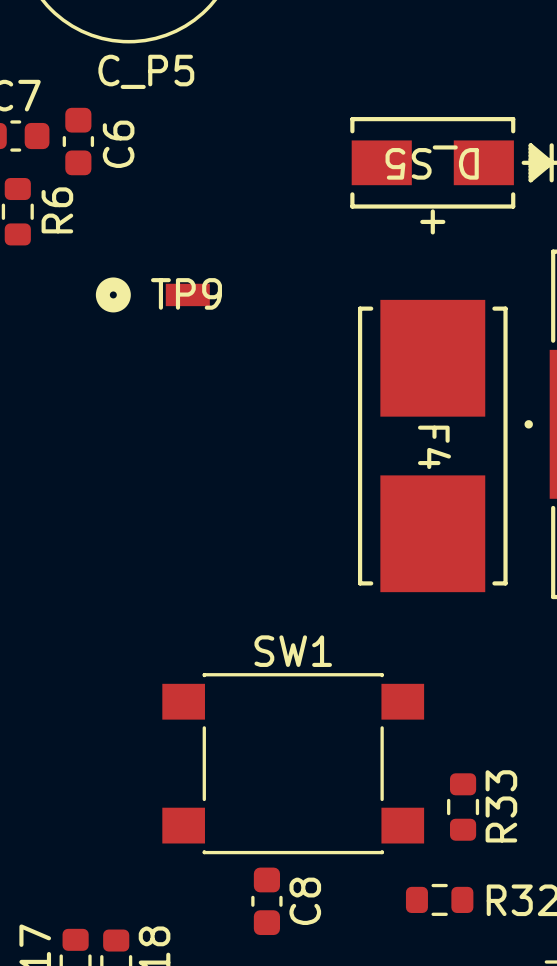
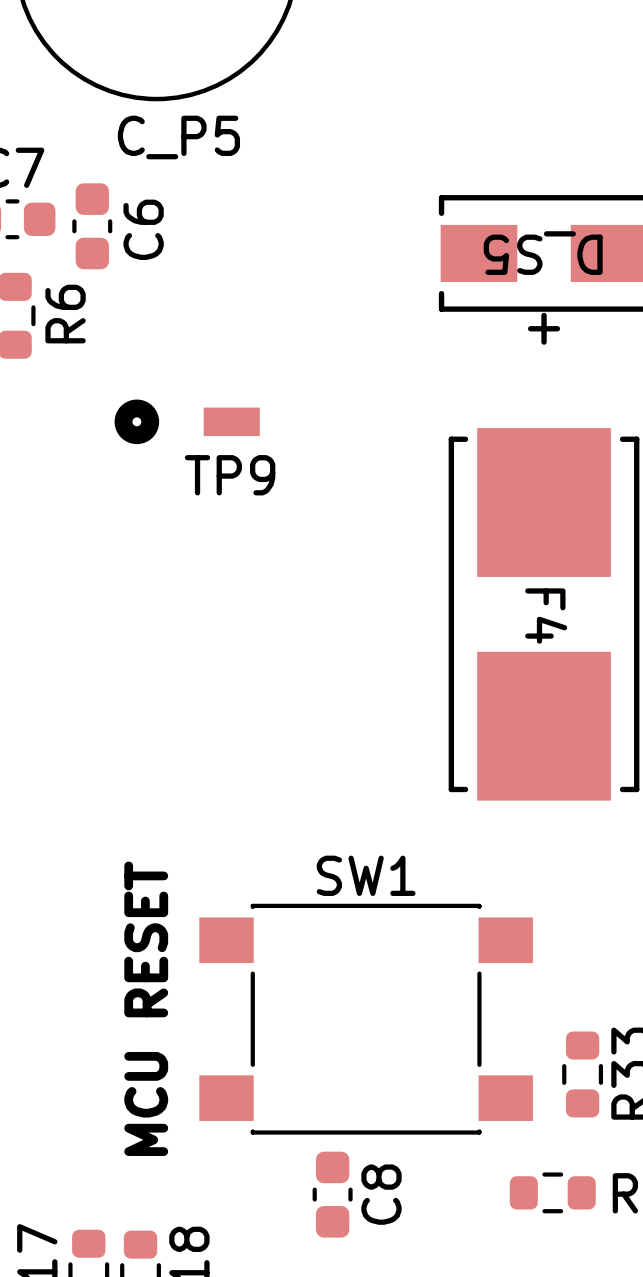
TP9 name position: TP9 (186, 293) -> TP9 (230, 475)
text: none -> MCU RESET (146, 1008)

